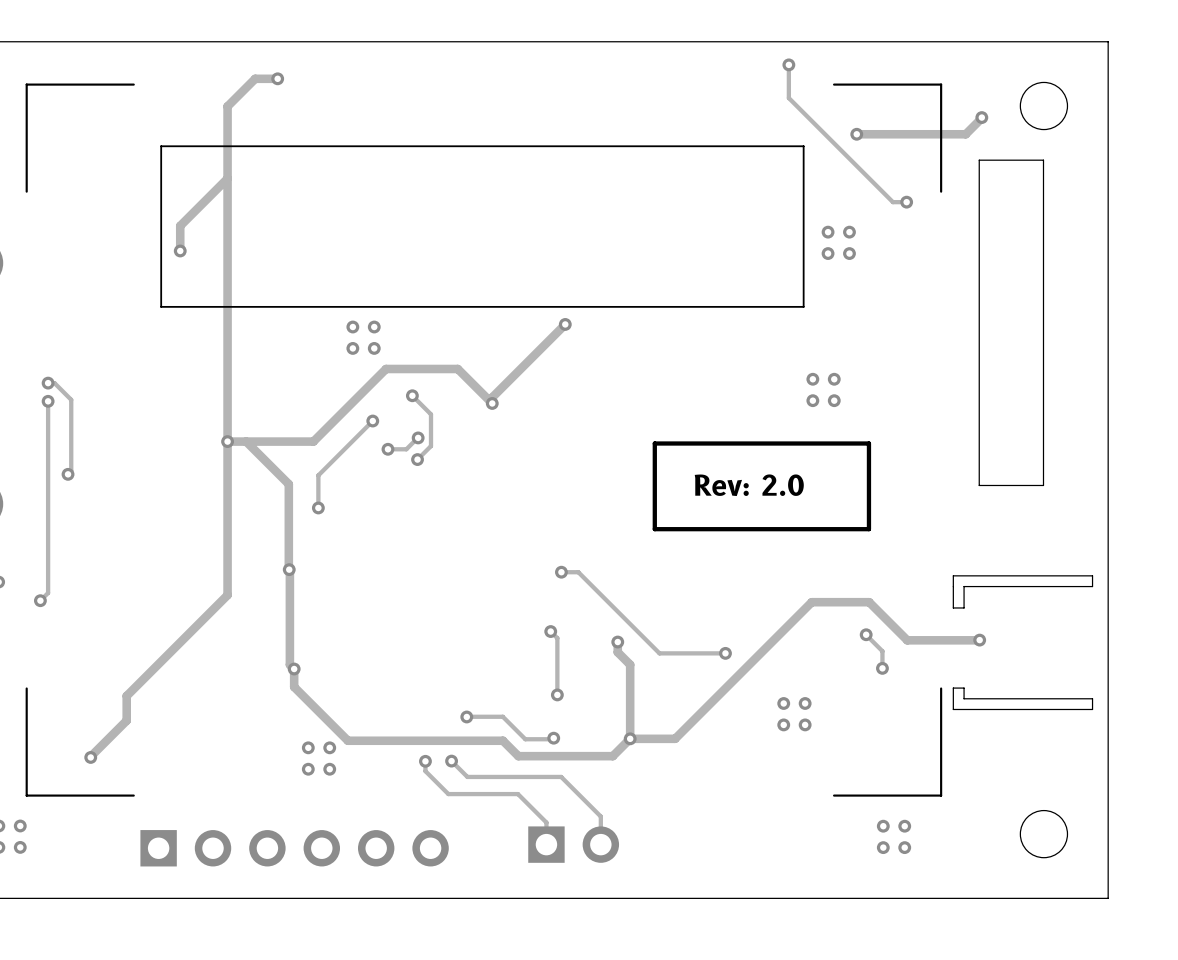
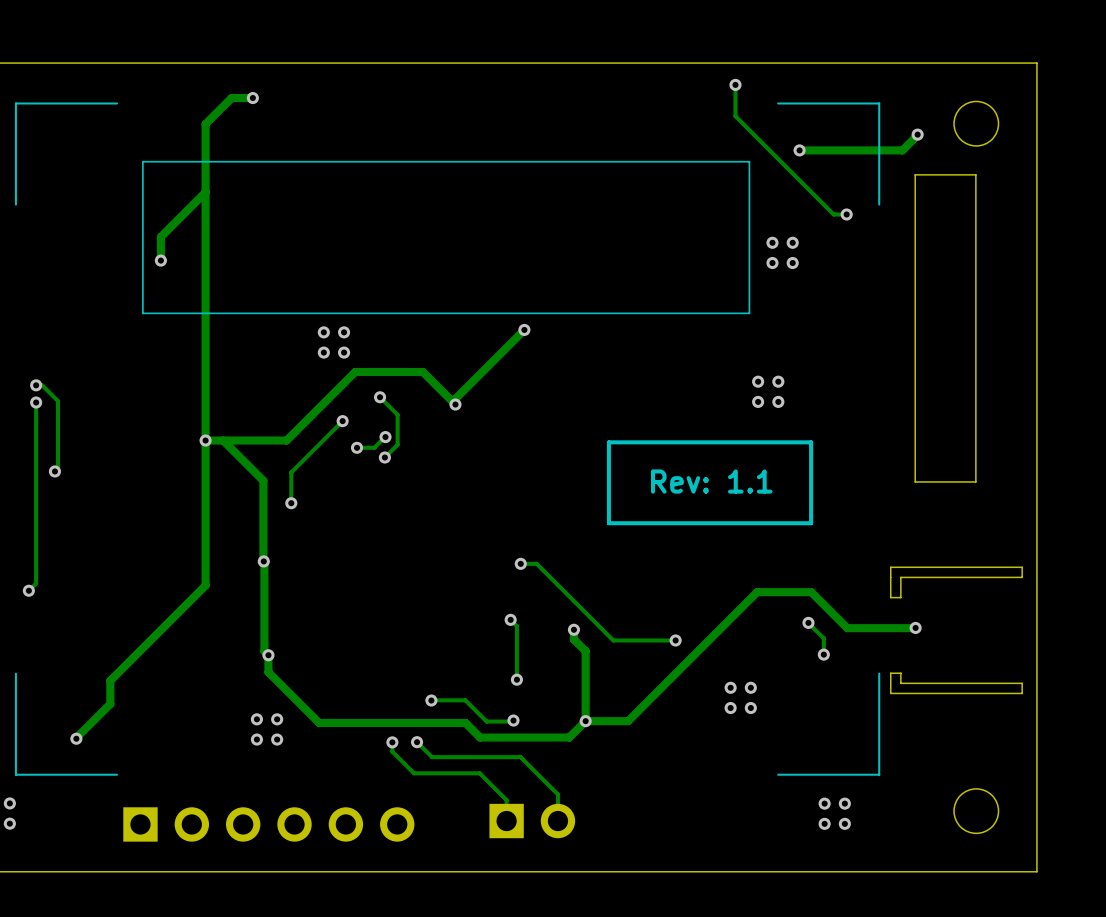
text: Rev: 2.0 (749, 485) -> Rev: 1.1 (711, 481)
via: none -> (256, 719)
via: none -> (277, 719)
via: (308, 747) -> none
via: (329, 747) -> none
via: none -> (256, 739)
via: none -> (277, 739)
via: (308, 769) -> none
via: (329, 769) -> none

